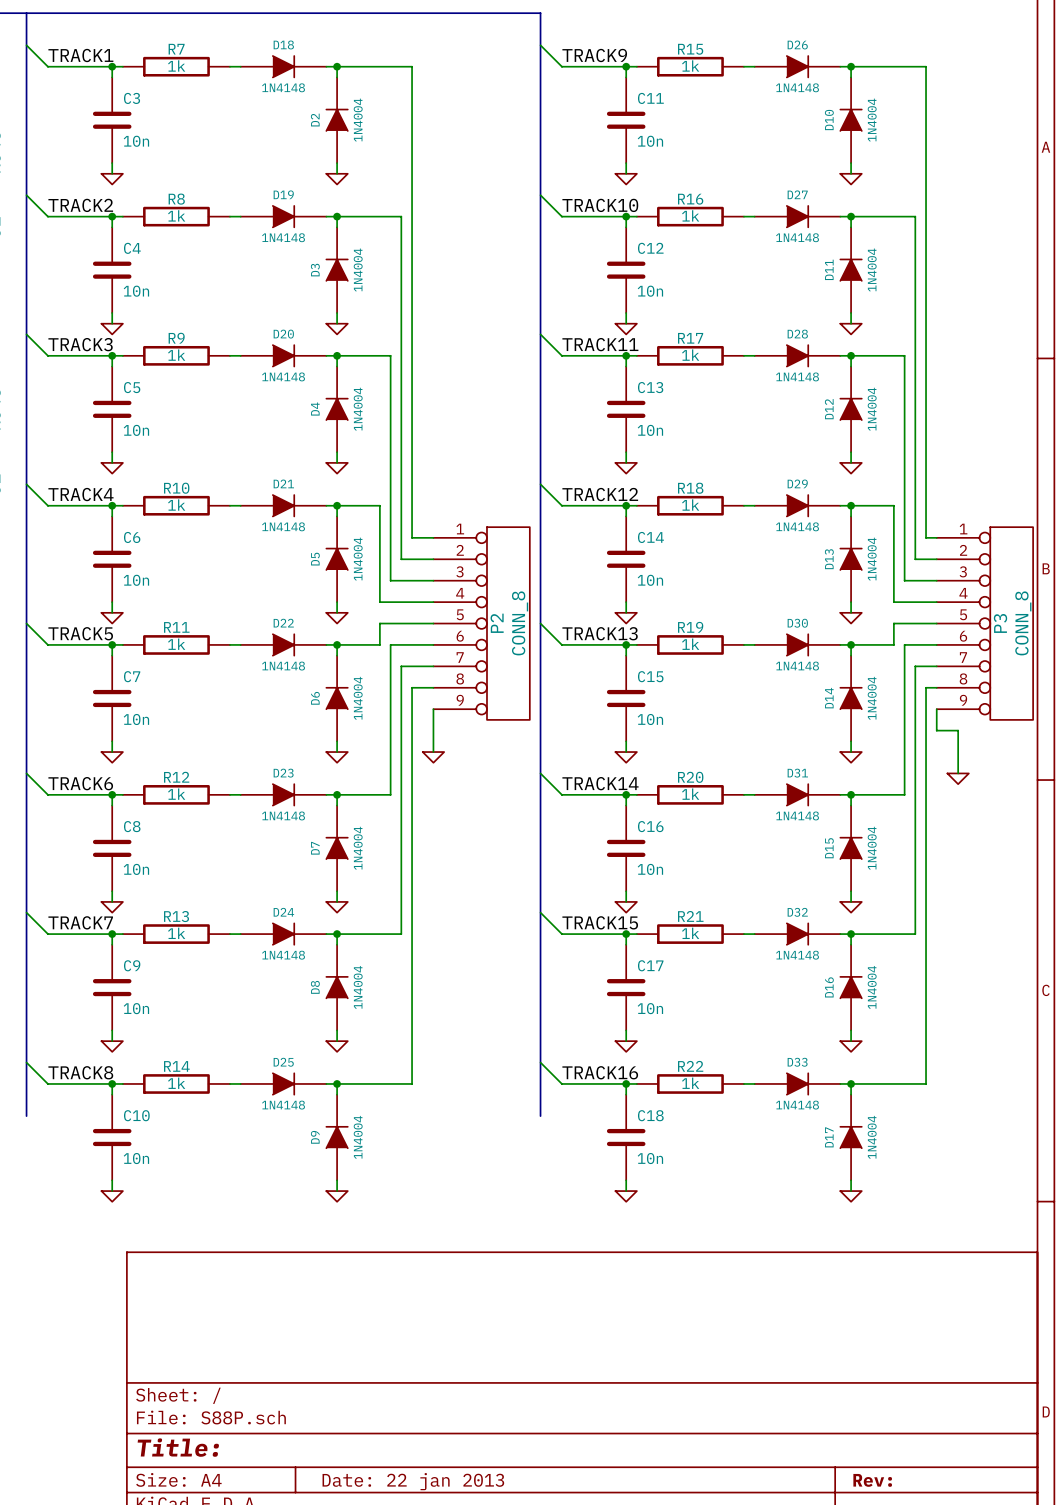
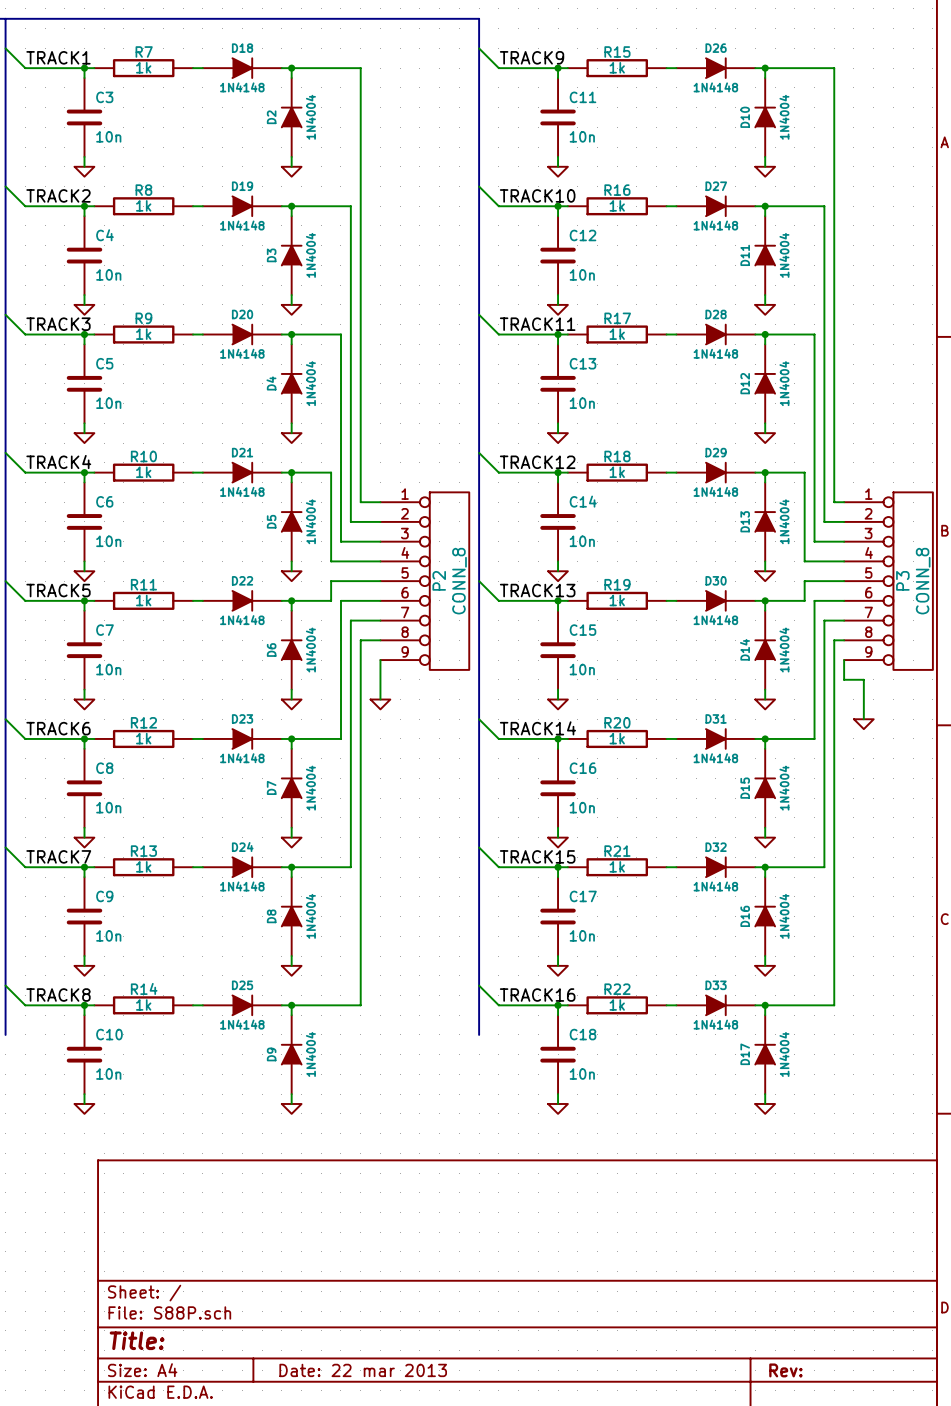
title block: Date: 22 jan 2013 (413, 1481) -> Date: 22 mar 2013 (363, 1370)

